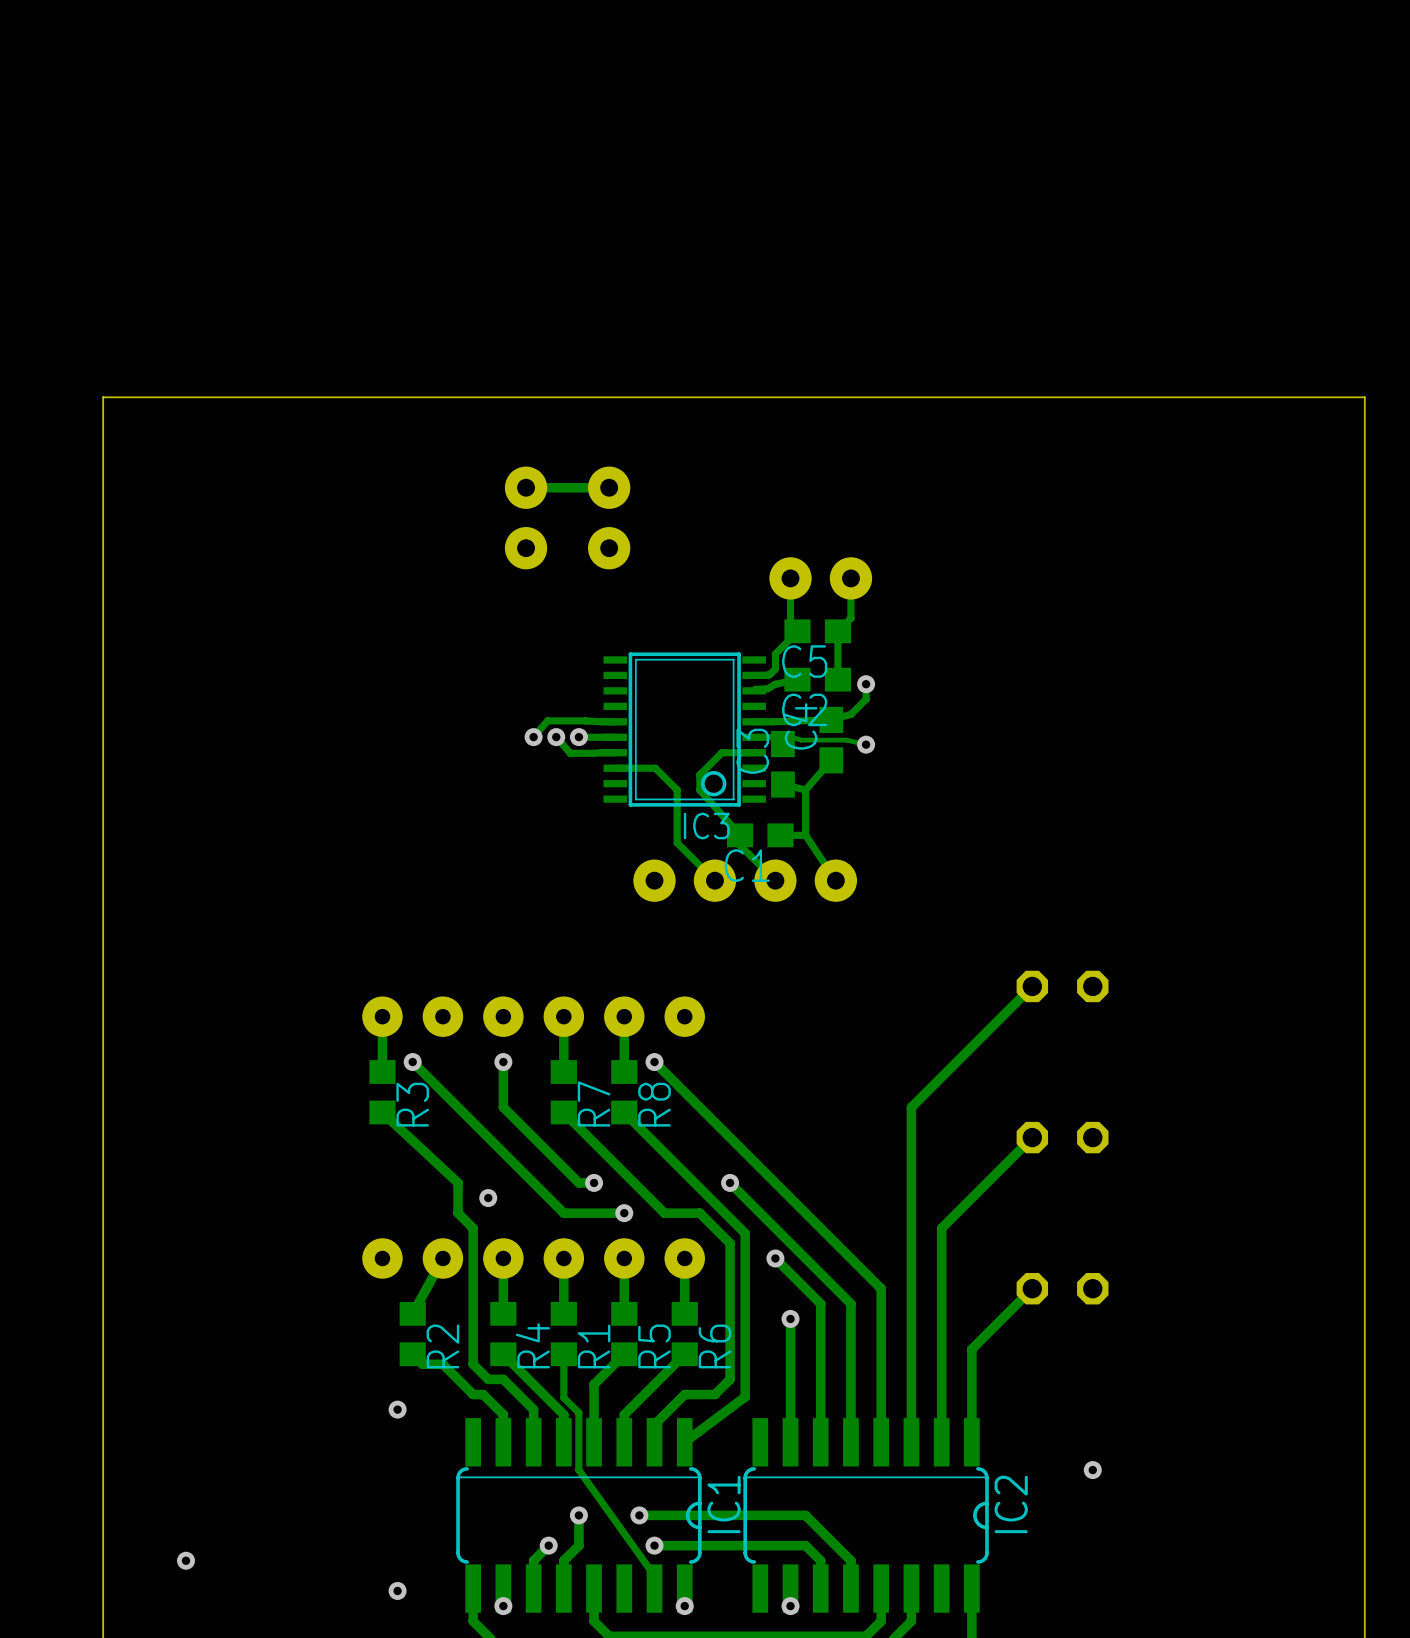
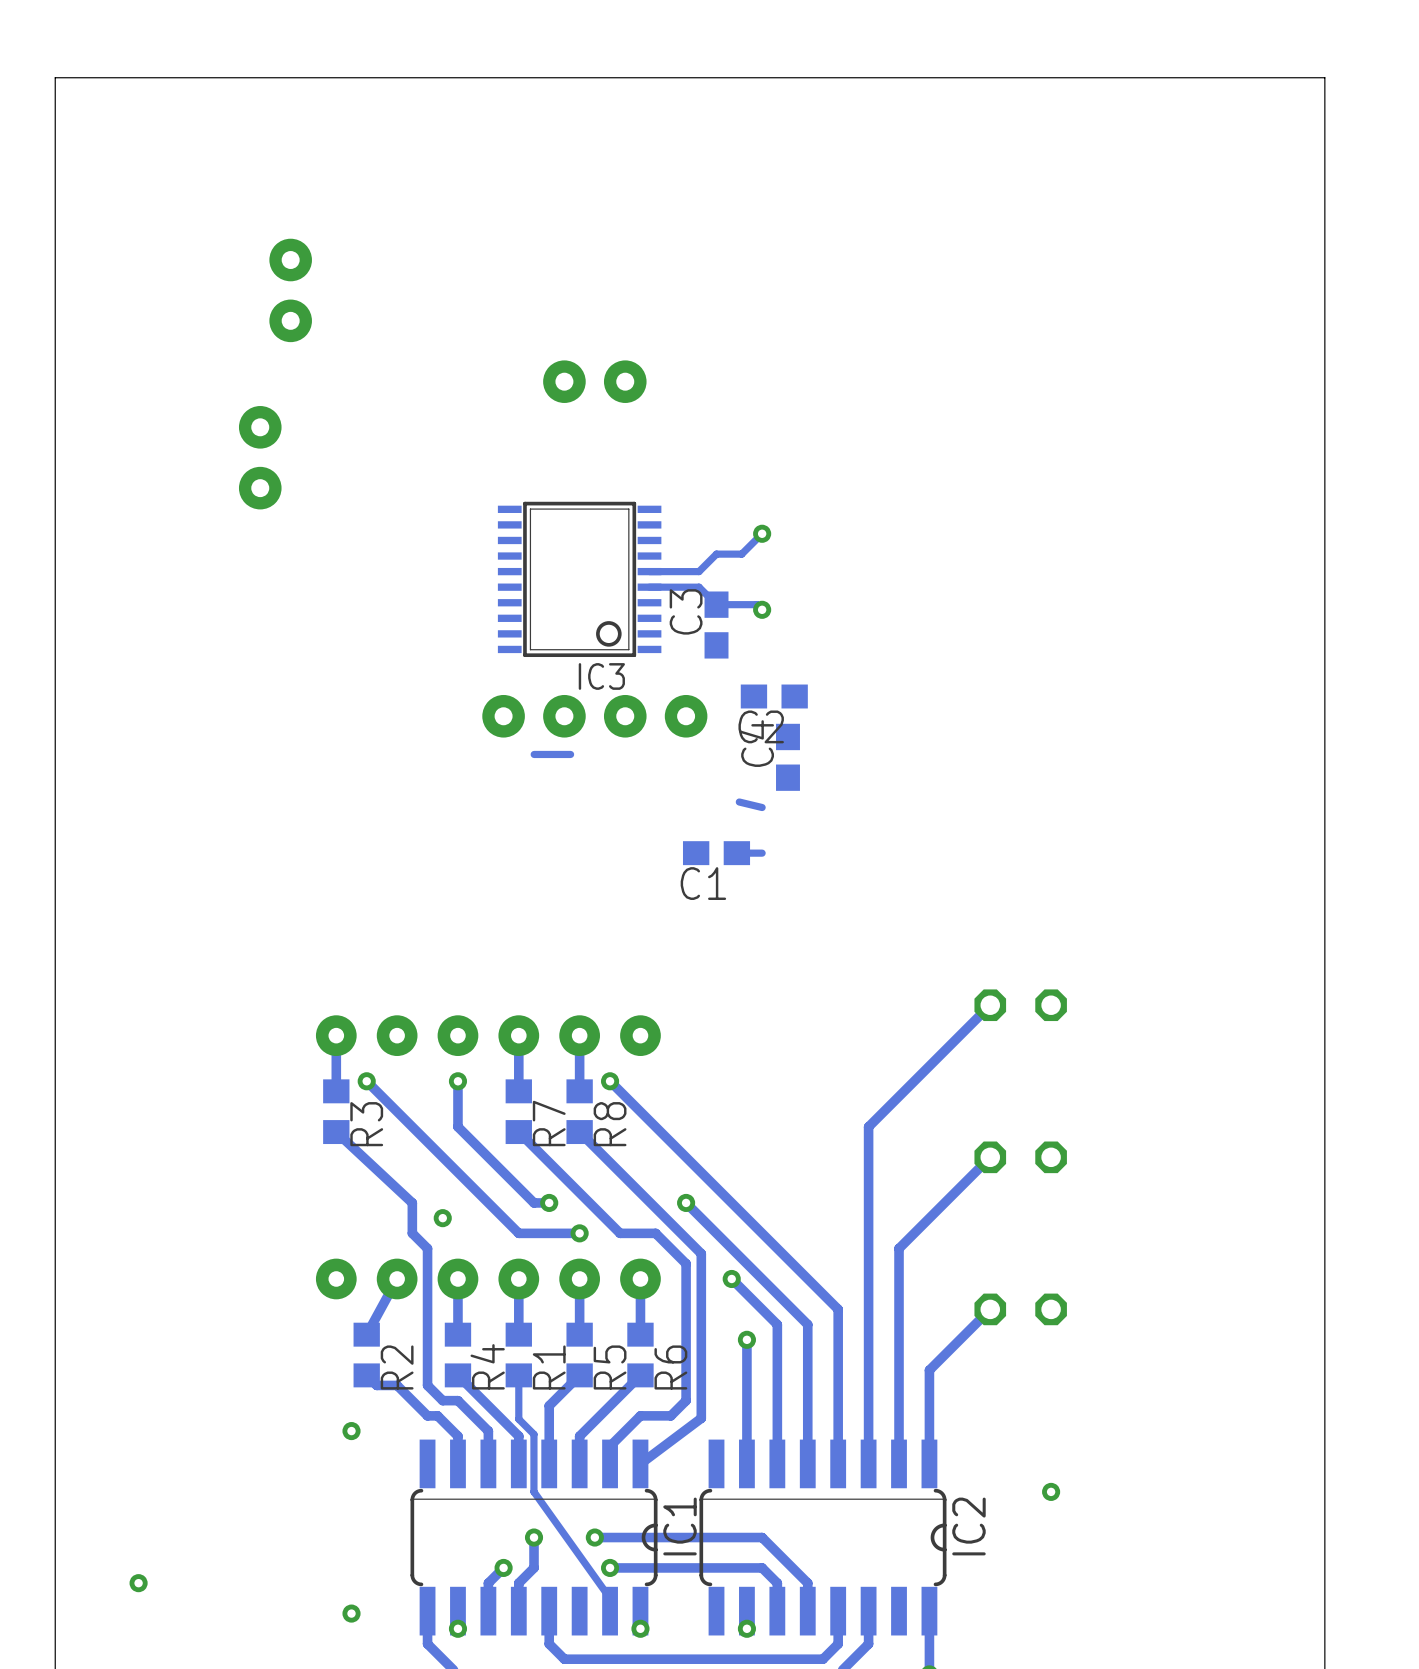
part: none -> (290, 290)
part: none -> (594, 381)
board edge: (1364, 397) (103, 397) -> (1324, 412) (1324, 77) (55, 77) (55, 412)
part: none -> (260, 457)
track: (609, 487) (526, 487) -> none
part: (526, 517) -> none
part: (609, 517) -> none
track: none -> (762, 533) (741, 554) (716, 554) (699, 571) (649, 571)
via: none -> (762, 533)
track: none -> (649, 587) (699, 587) (716, 604) (756, 604) (762, 609)
track: (790, 578) (790, 624) (797, 631) (775, 653) (775, 669) (768, 675) (754, 675) -> none
part: (820, 578) -> none
track: (850, 578) (850, 618) (837, 631) (837, 679) -> none
via: none -> (762, 609)
C5: (817, 631) -> none
track: (797, 679) (754, 690) -> none
track: (866, 684) (866, 699) (850, 714) (831, 719) (754, 721) -> none
via: (866, 684) -> none
track: (615, 721) (547, 720) (533, 737) -> none
IC3 position: (684, 729) -> (579, 579)
via: (533, 737) -> none
track: (556, 737) (570, 753) (615, 752) -> none
via: (556, 737) -> none
via: (578, 737) -> none
track: (754, 737) (773, 737) (782, 744) (789, 736) (801, 740) (846, 740) (866, 744) -> none
via: (866, 744) -> none
track: (754, 752) (721, 752) (699, 774) (699, 789) (740, 835) (740, 845) (775, 880) -> none
track: (831, 760) (805, 789) (805, 835) (835, 880) -> none
C3 position: (782, 764) -> (716, 625)
track: (615, 768) (655, 768) (677, 789) (677, 842) (714, 880) -> none
part position: (745, 880) -> (594, 716)

